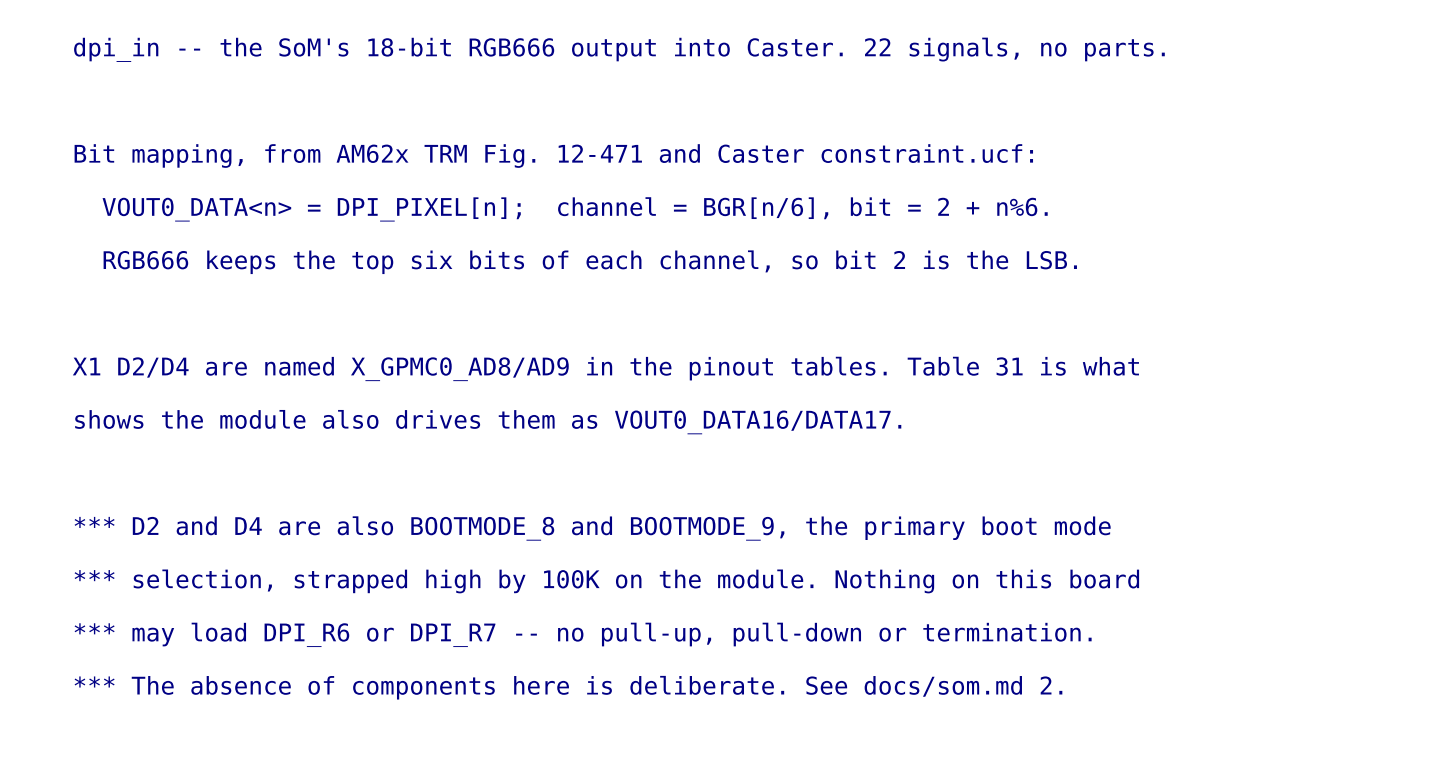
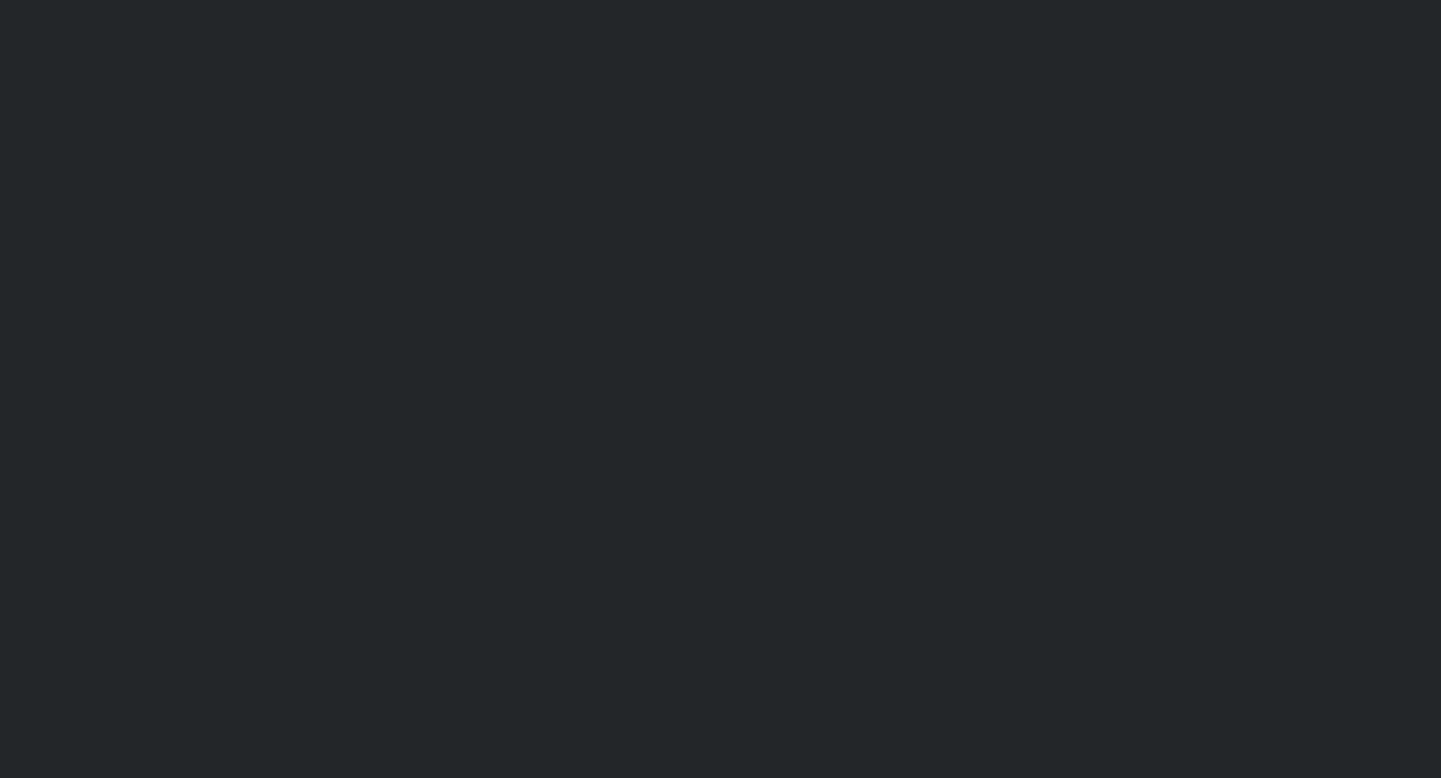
text: dpi_in -- the SoM's 18-bit RGB666 output into Caster. 22 signals, no parts. (619, 49) -> none
text: Bit mapping, from AM62x TRM Fig. 12-471 and Caster constraint.ucf: (553, 156) -> none
text: VOUT0_DATA<n> = DPI_PIXEL[n]; channel = BGR[n/6], bit = 2 + n%6. (575, 209) -> none
text: RGB666 keeps the top six bits of each channel, so bit 2 is the LSB. (590, 262) -> none
text: X1 D2/D4 are named X_GPMC0_AD8/AD9 in the pinout tables. Table 31 is what (605, 368) -> none
text: shows the module also drives them as VOUT0_DATA16/DATA17. (488, 422) -> none
text: *** D2 and D4 are also BOOTMODE_8 and BOOTMODE_9, the primary boot mode (592, 528) -> none
text: *** selection, strapped high by 100K on the module. Nothing on this board (606, 581) -> none
text: *** may load DPI_R6 or DPI_R7 -- no pull-up, pull-down or termination. (583, 634) -> none
text: *** The absence of components here is deliberate. See docs/som.md 2. (568, 687) -> none

